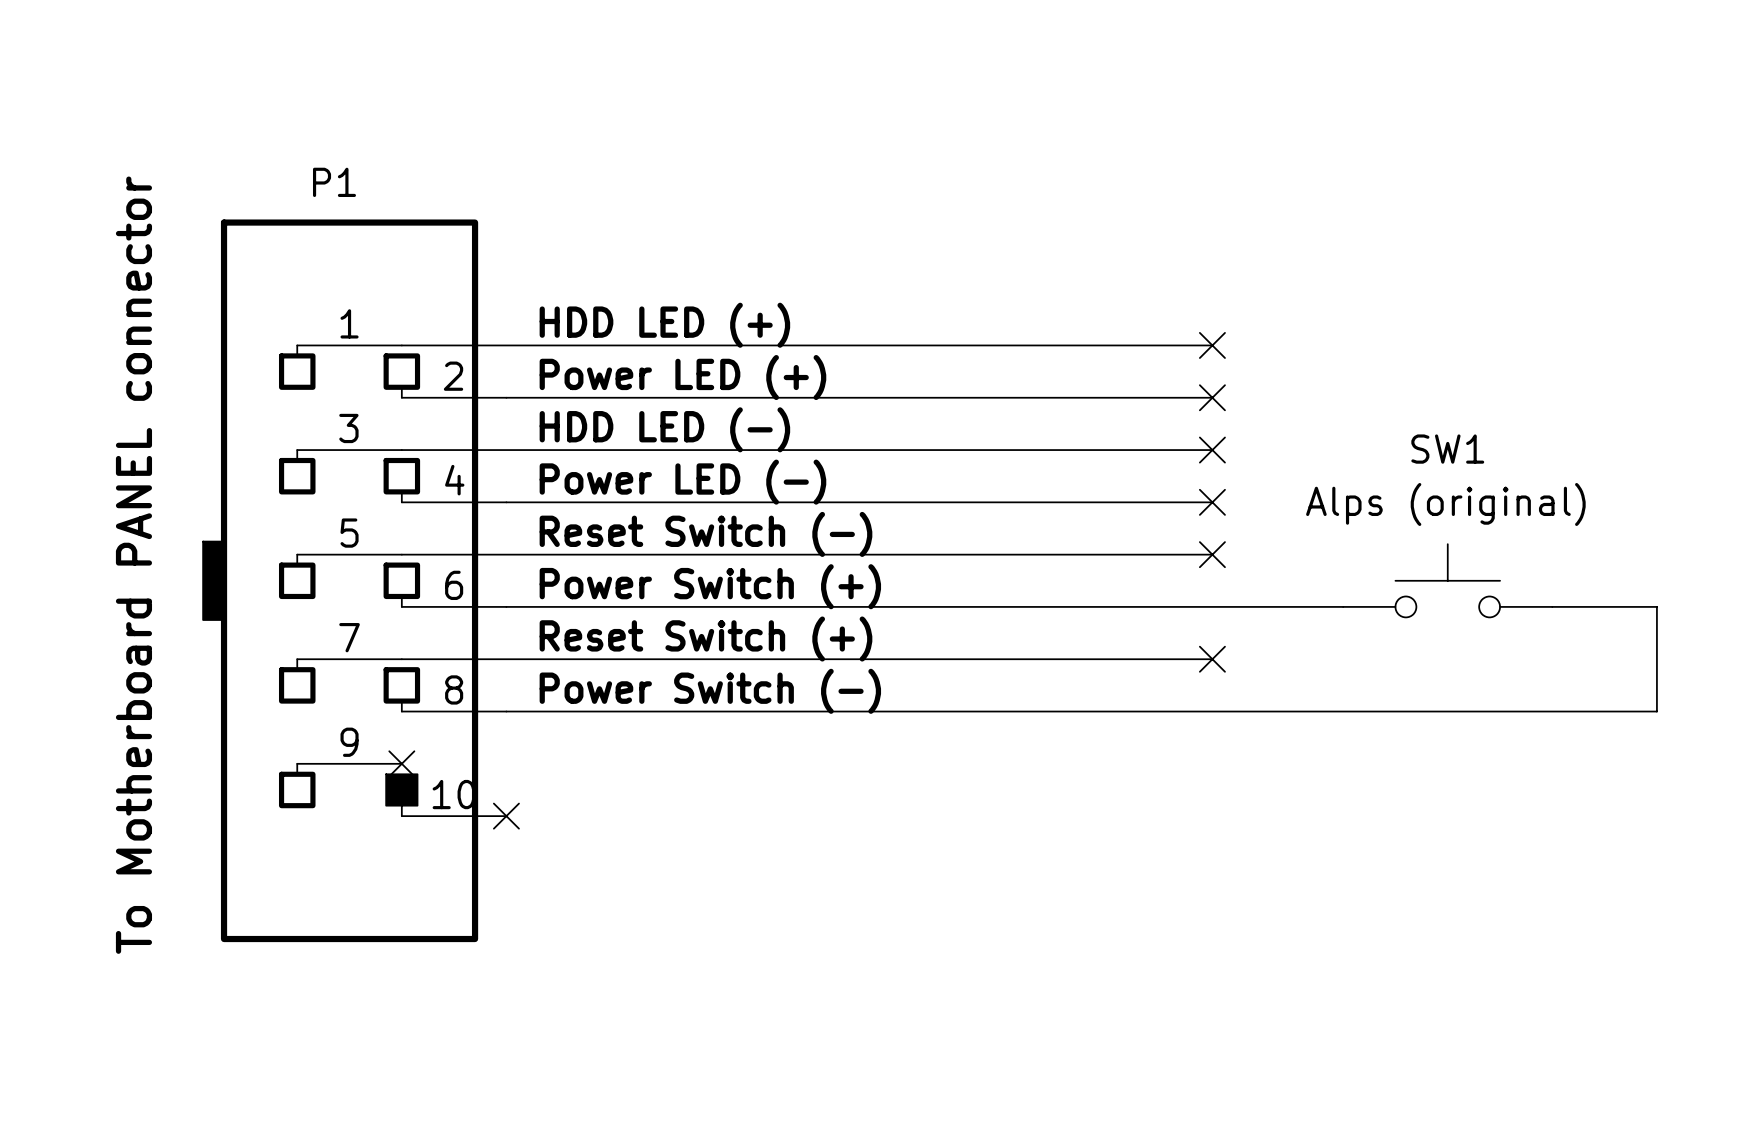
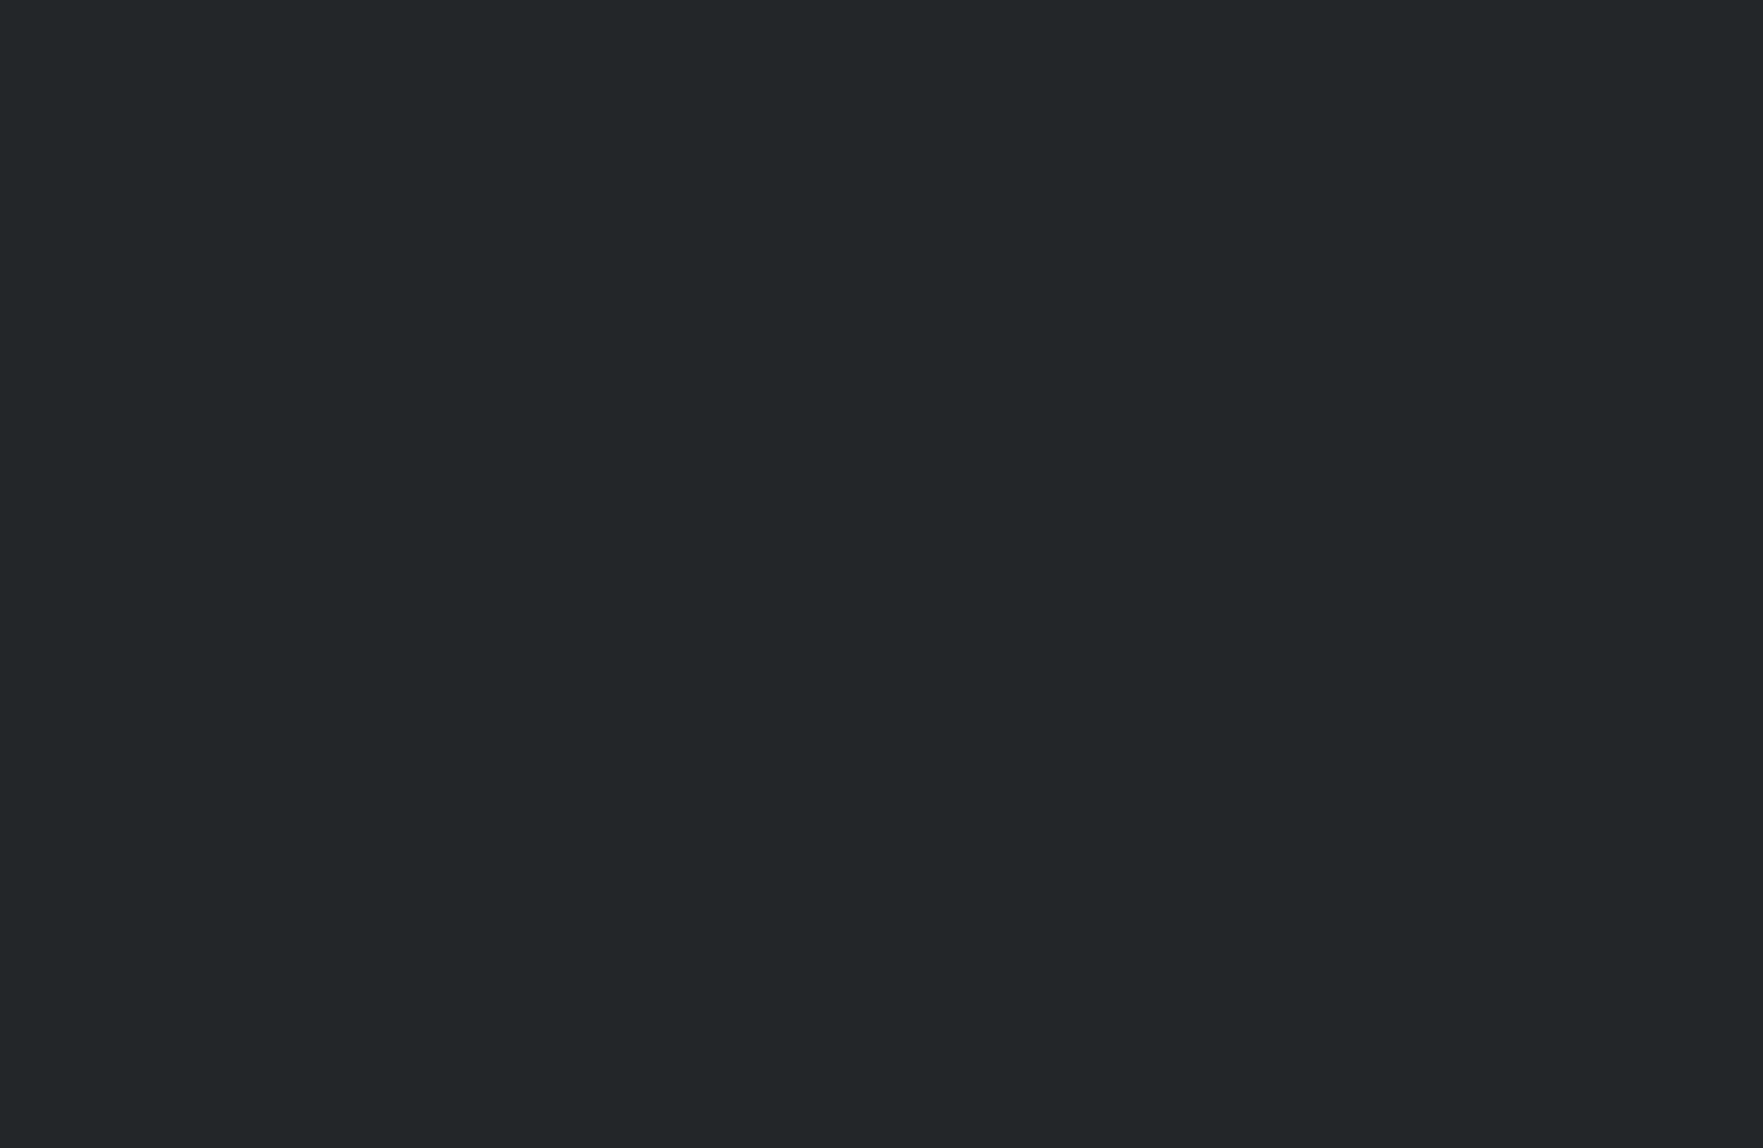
label: HDD LED (+) (664, 325) -> none
wire: (401, 345) (1212, 345) -> none
no-connect mark: (1212, 345) -> none
label: Power LED (+) (682, 377) -> none
wire: (506, 397) (1212, 397) -> none
no-connect mark: (1212, 397) -> none
label: HDD LED (-) (664, 429) -> none
wire: (401, 450) (1212, 450) -> none
no-connect mark: (1212, 450) -> none
label: Power LED (-) (682, 482) -> none
wire: (506, 502) (1212, 502) -> none
no-connect mark: (1212, 502) -> none
label: Reset Switch (-) (705, 534) -> none
wire: (401, 554) (1212, 554) -> none
no-connect mark: (1212, 554) -> none
text: To Motherboard PANEL connector (133, 565) -> none
P1: (354, 580) -> none
SW1: Alps (original) (1447, 580) -> none
label: Power Switch (+) (710, 586) -> none
wire: (506, 606) (1343, 606) -> none
wire: (1552, 606) (1656, 606) (1656, 711) (506, 711) -> none
label: Reset Switch (+) (705, 639) -> none
wire: (401, 659) (1212, 659) -> none
no-connect mark: (1212, 659) -> none
label: Power Switch (-) (710, 691) -> none
no-connect mark: (401, 763) -> none
no-connect mark: (506, 816) -> none

